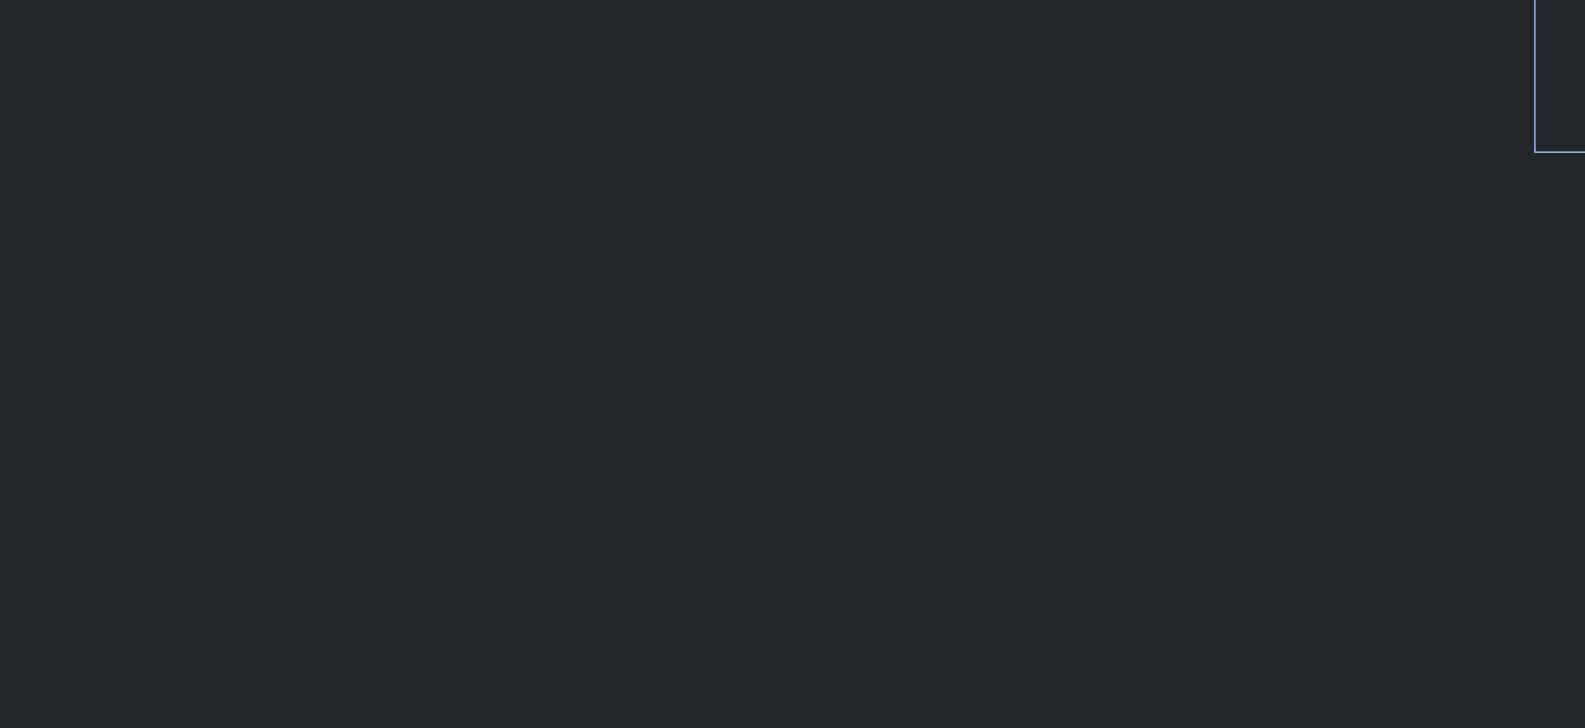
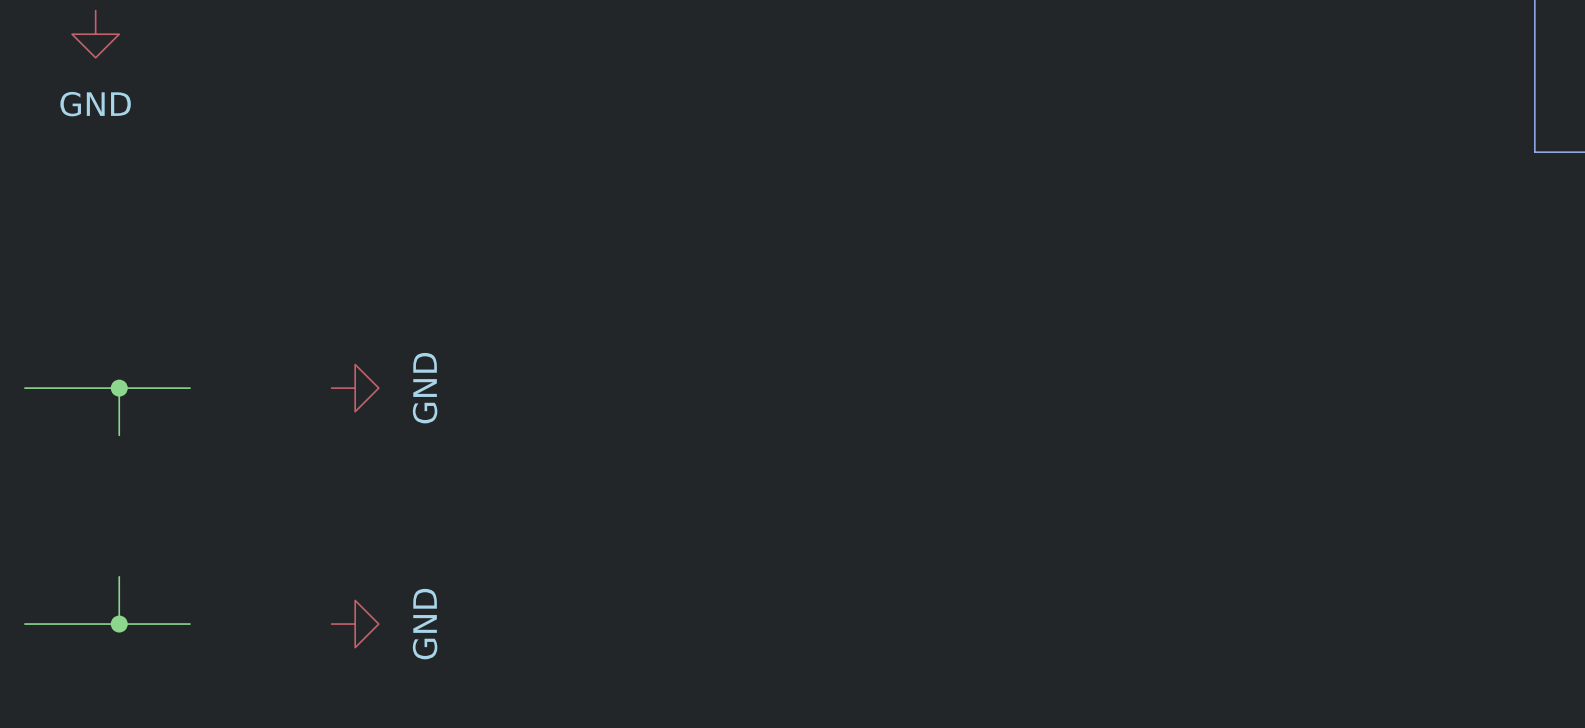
power symbol: none -> GND (95, 34)
wire: none -> (24, 388) (190, 388)
wire: none -> (119, 388) (119, 435)
junction: none -> (119, 388)
power symbol: none -> GND (355, 388)
wire: none -> (119, 576) (119, 624)
wire: none -> (24, 624) (190, 624)
junction: none -> (119, 624)
power symbol: none -> GND (355, 624)

